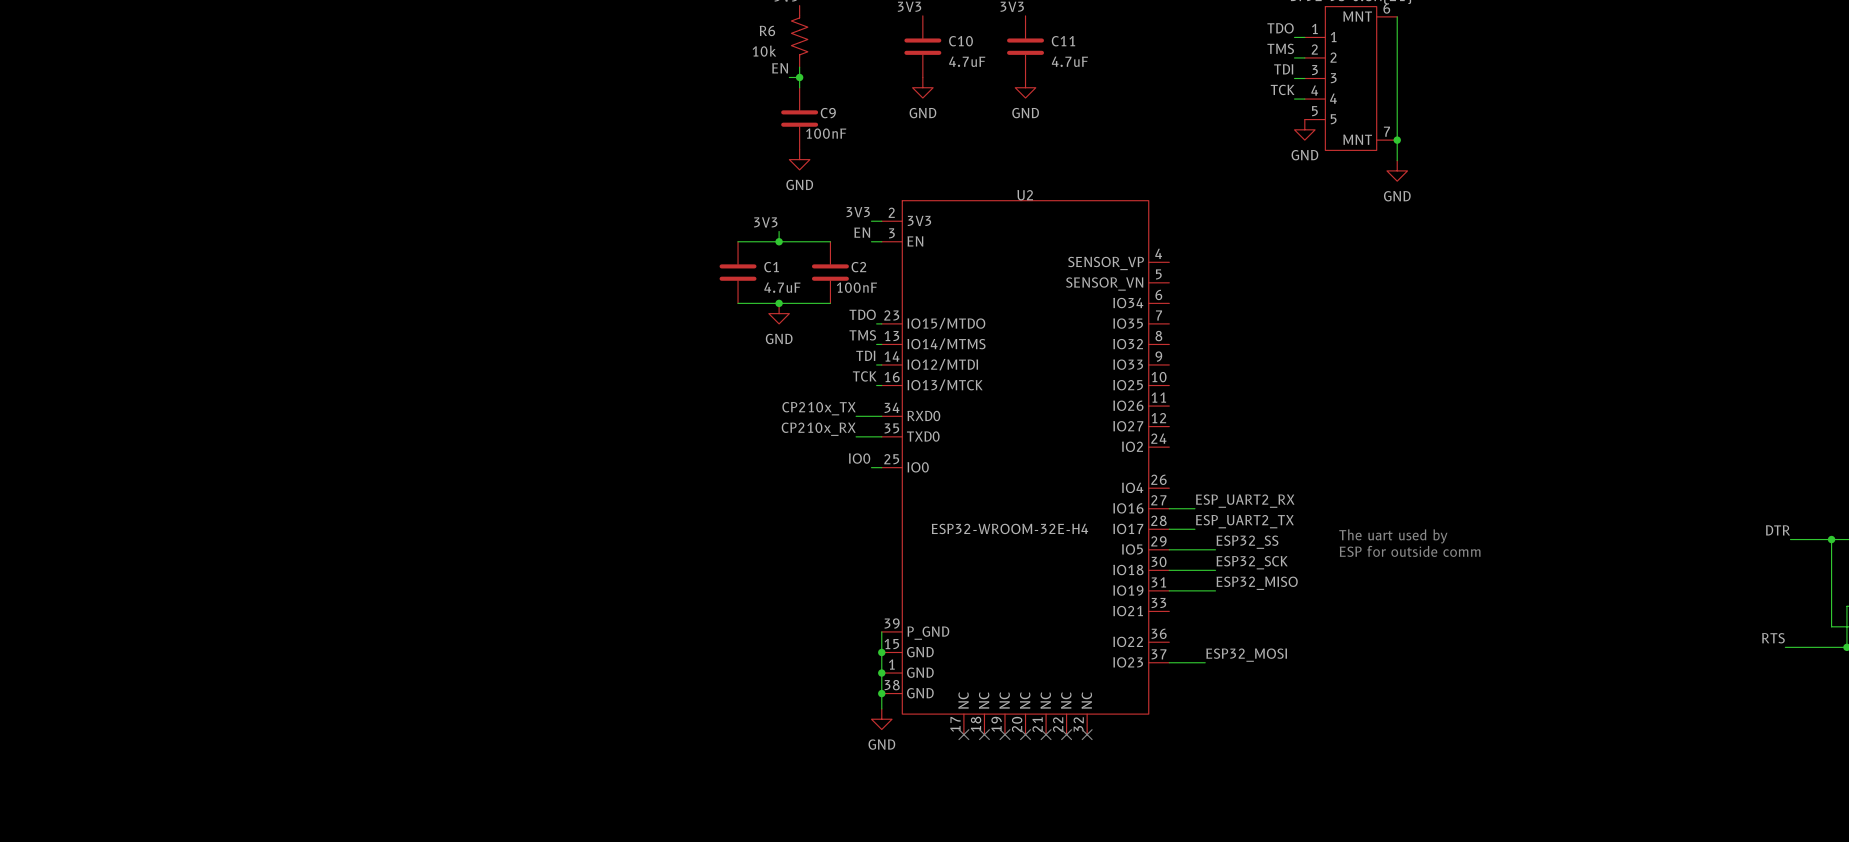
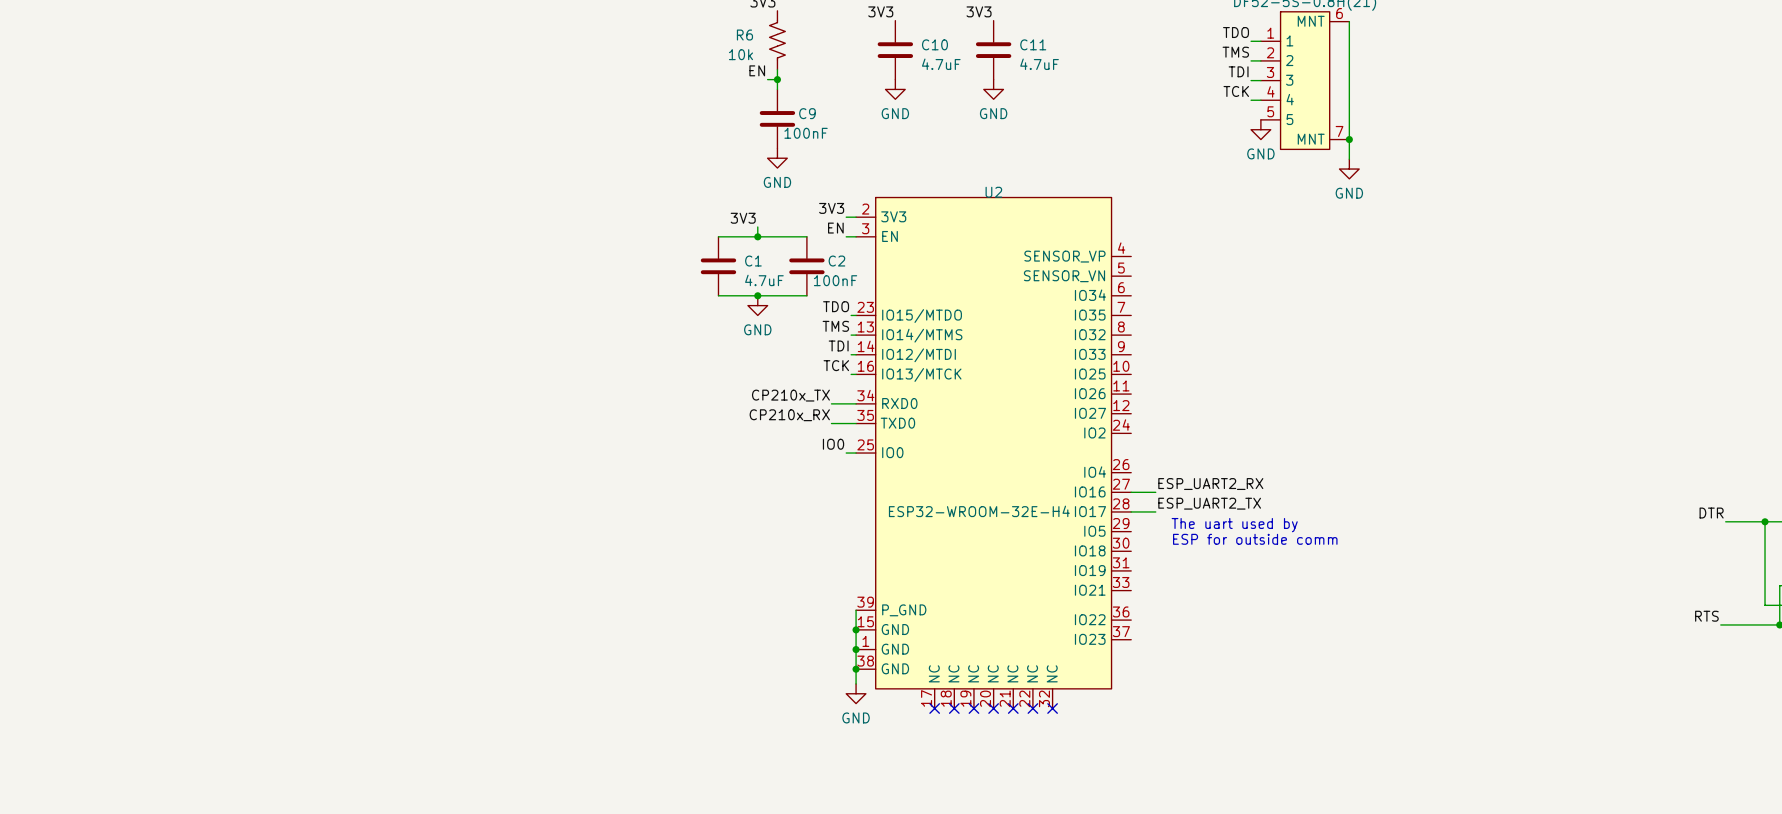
text position: The uart used by (1393, 536) -> The uart used by (1234, 525)
label: ESP32_SS (1247, 542) -> none
wire: (1169, 549) (1215, 549) -> none
text position: ESP for outside comm (1410, 551) -> ESP for outside comm (1255, 539)
label: ESP32_SCK (1252, 562) -> none
wire: (1169, 570) (1215, 570) -> none
label: ESP32_MISO (1257, 583) -> none
wire: (1169, 590) (1215, 590) -> none
label: ESP32_MOSI (1246, 655) -> none
wire: (1169, 662) (1205, 662) -> none

